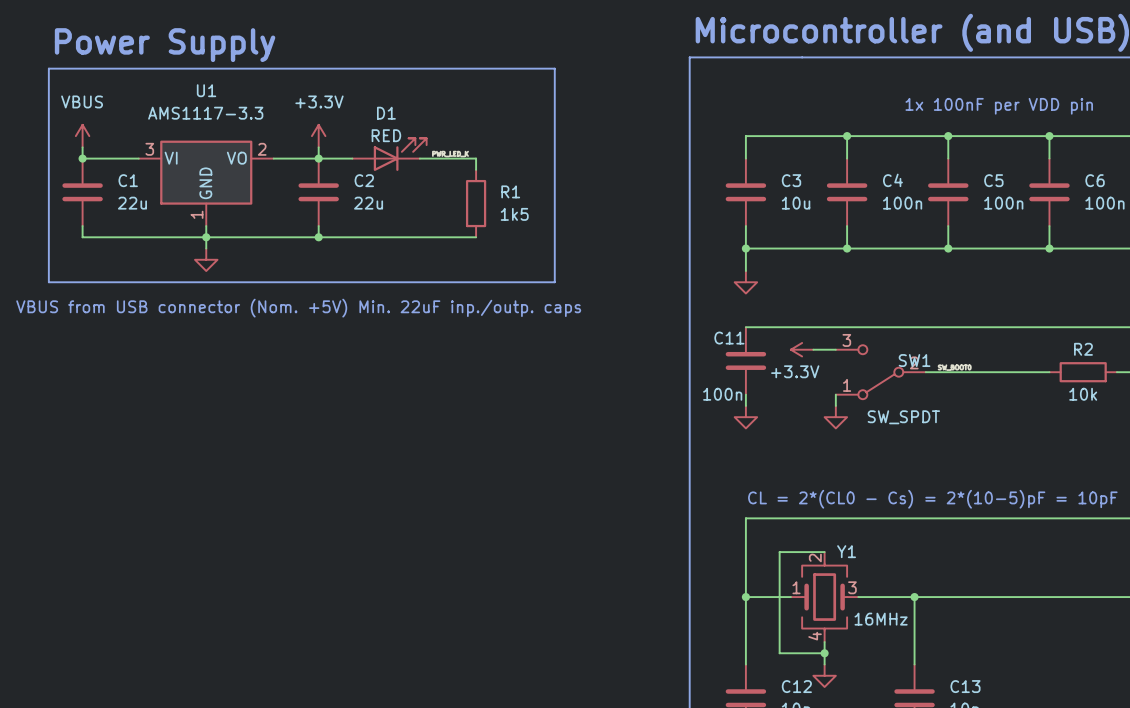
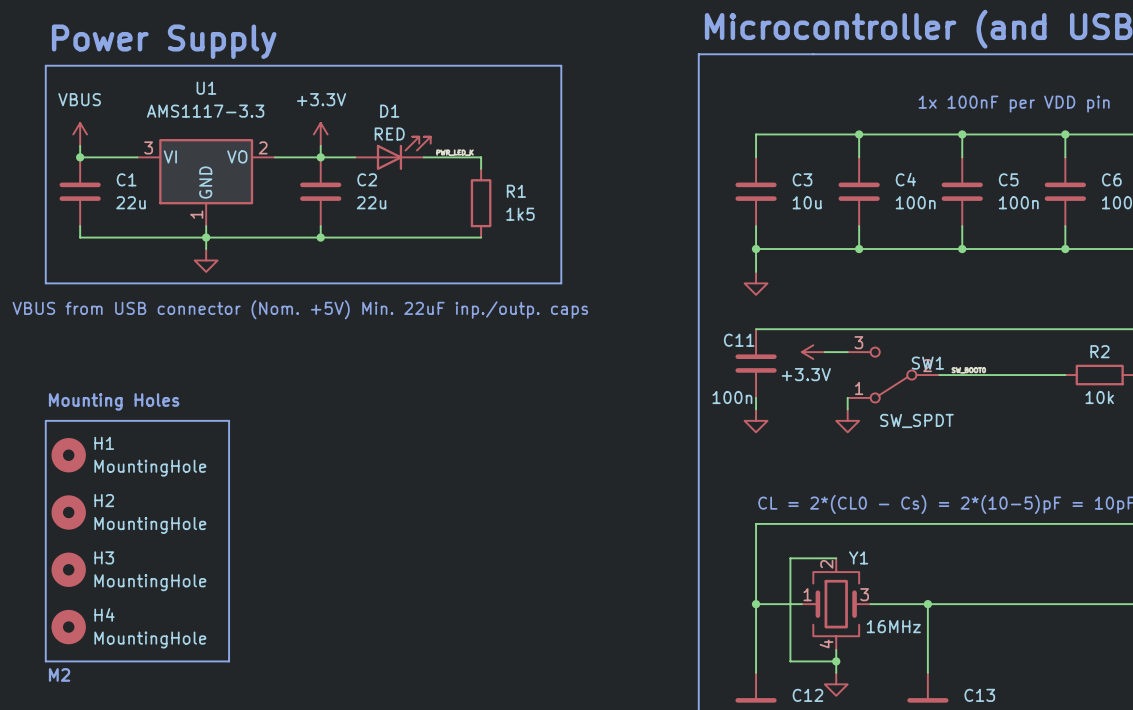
text: none -> Mounting Holes (114, 401)
line: none -> (45, 420) (229, 420) (229, 661) (45, 661) (45, 420)
H1: none -> MountingHole (68, 455)
H2: none -> MountingHole (68, 512)
H3: none -> MountingHole (68, 569)
H4: none -> MountingHole (68, 627)
text: none -> M2 (59, 674)

